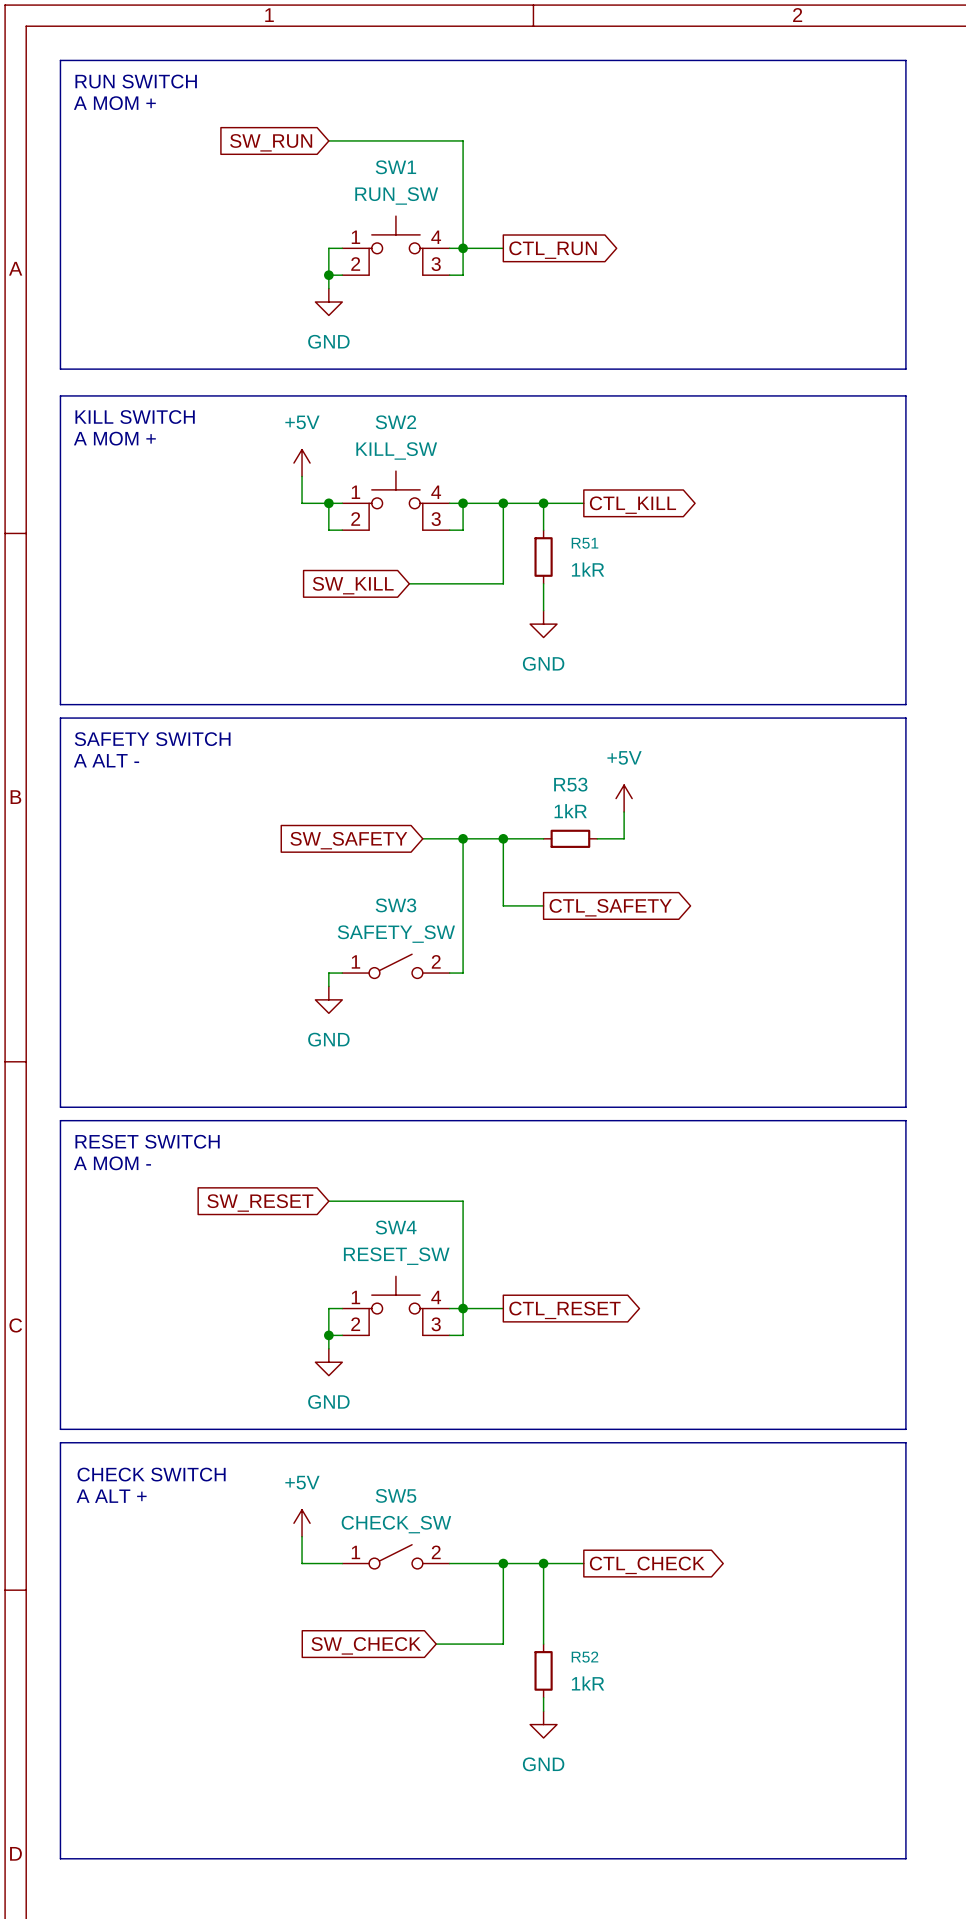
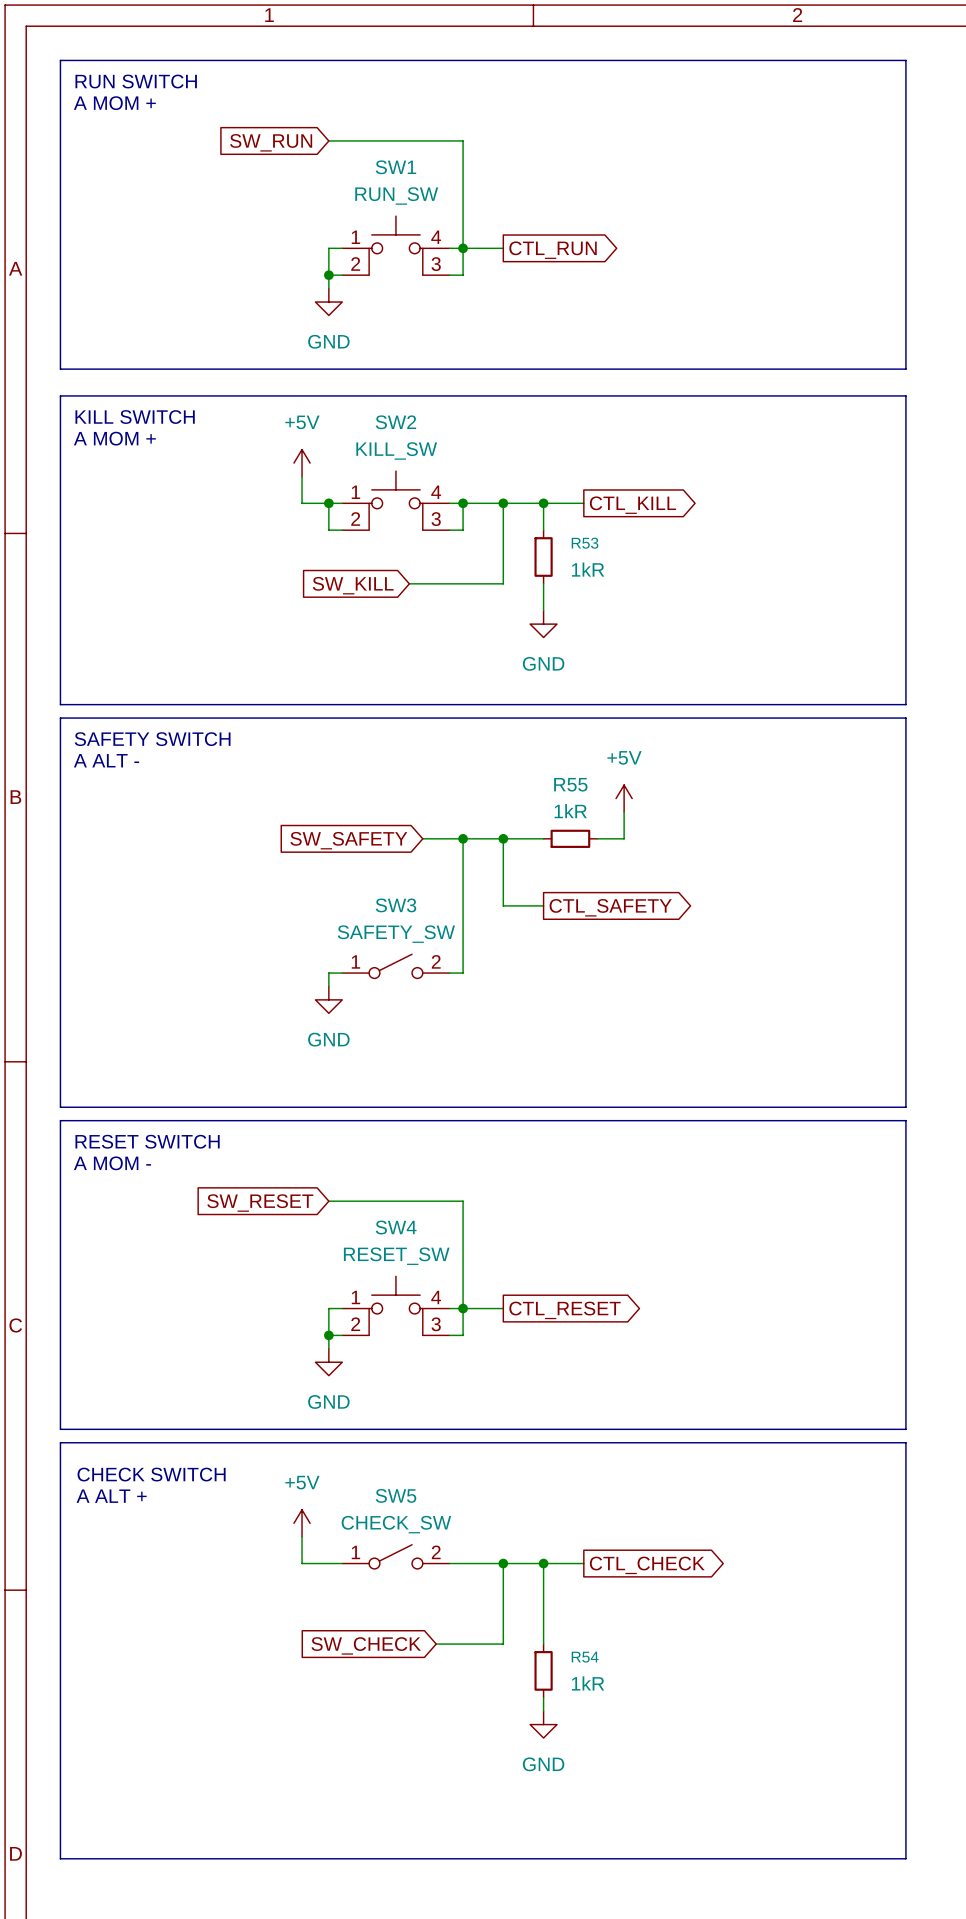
R51 name: R51 (585, 543) -> R53 (585, 543)
R53 name: R53 (570, 784) -> R55 (570, 784)
R52 name: R52 (584, 1657) -> R54 (585, 1657)

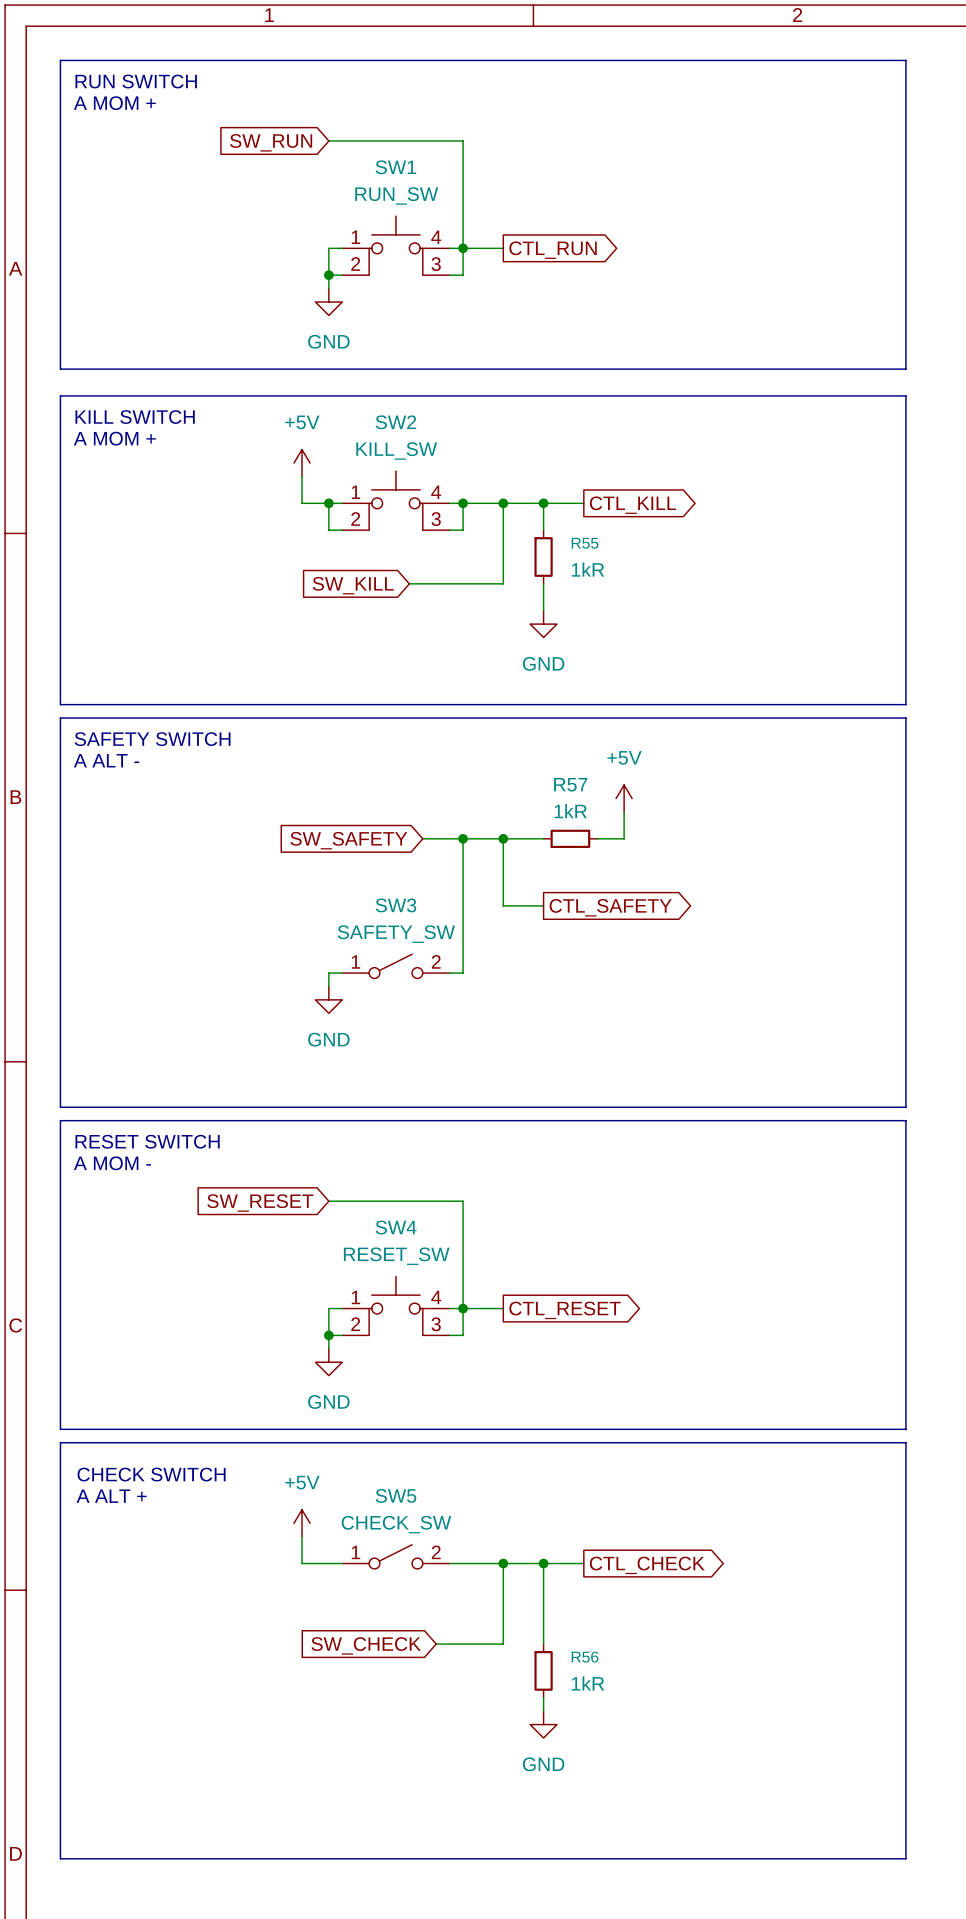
R53 name: R53 (585, 543) -> R55 (585, 543)
R55 name: R55 (570, 784) -> R57 (570, 784)
R54 name: R54 (585, 1657) -> R56 (585, 1657)

